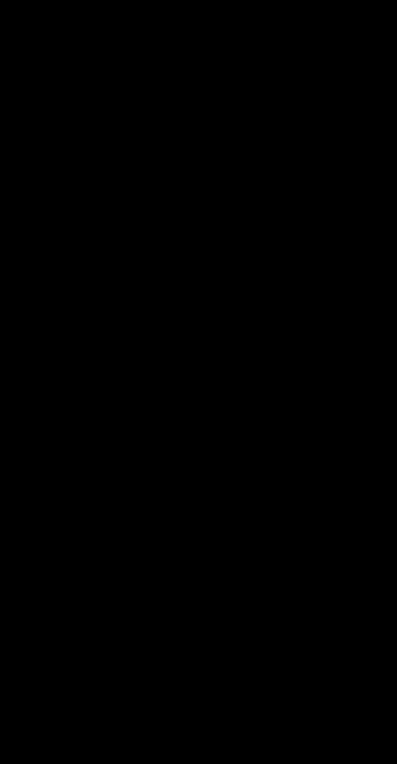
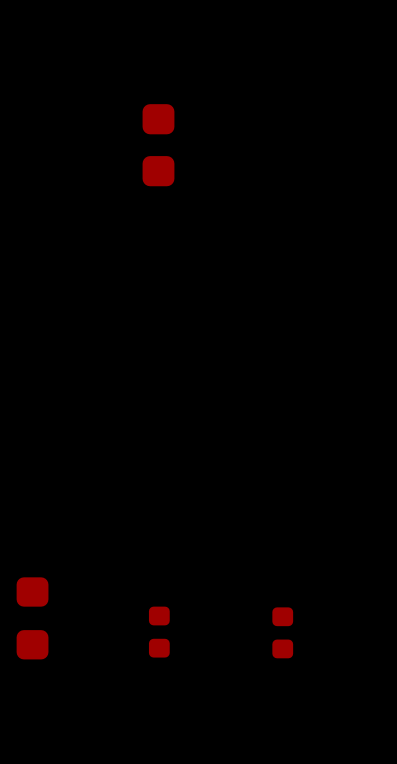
part: none -> (158, 145)
part: none -> (32, 618)
part: none -> (159, 632)
part: none -> (282, 632)

